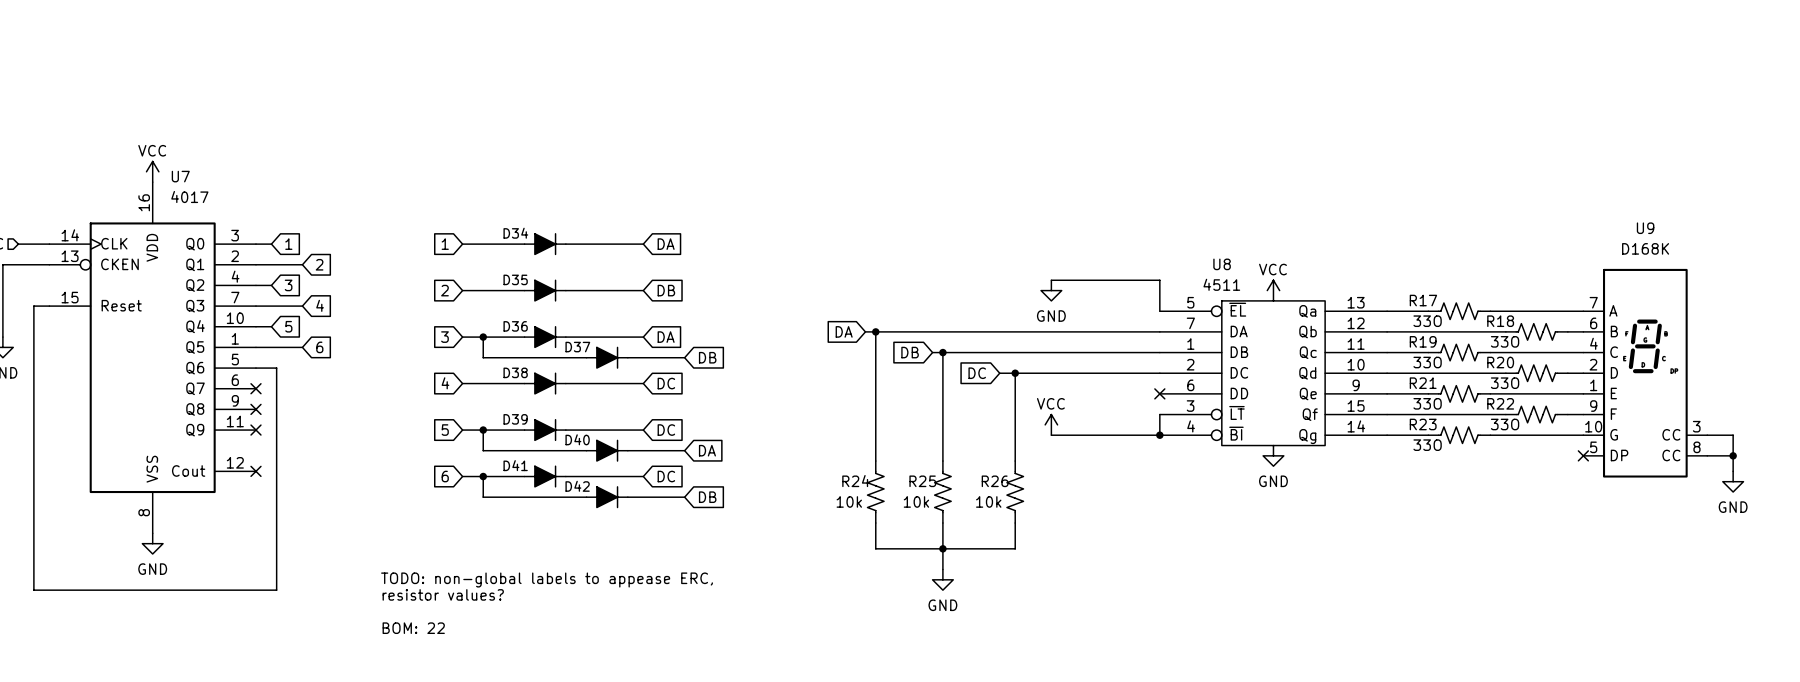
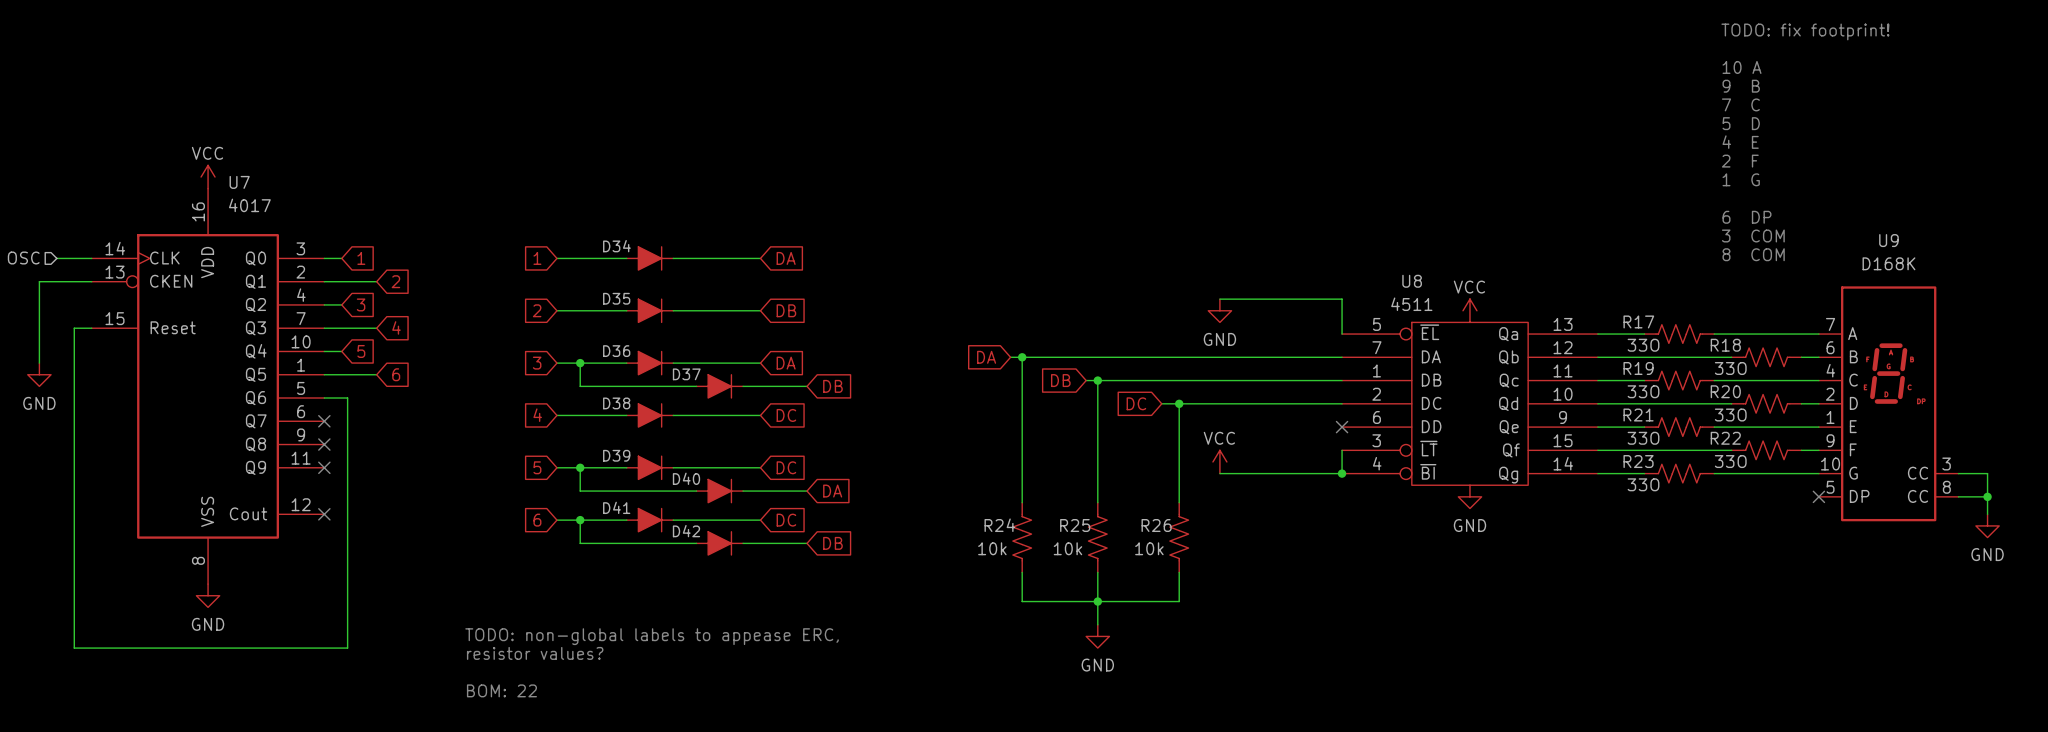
text: none -> TODO: fix footprint! (1805, 31)
text: none -> 10 A (1742, 67)
text: none -> 9 B (1741, 86)
text: none -> 7 C (1740, 104)
text: none -> 5 D (1741, 123)
text: none -> 4 E (1740, 142)
text: none -> 2 F (1740, 161)
text: none -> 1 G (1741, 179)
text: none -> 6 DP (1746, 217)
text: none -> 3 COM (1753, 236)
text: none -> 8 COM (1753, 254)

